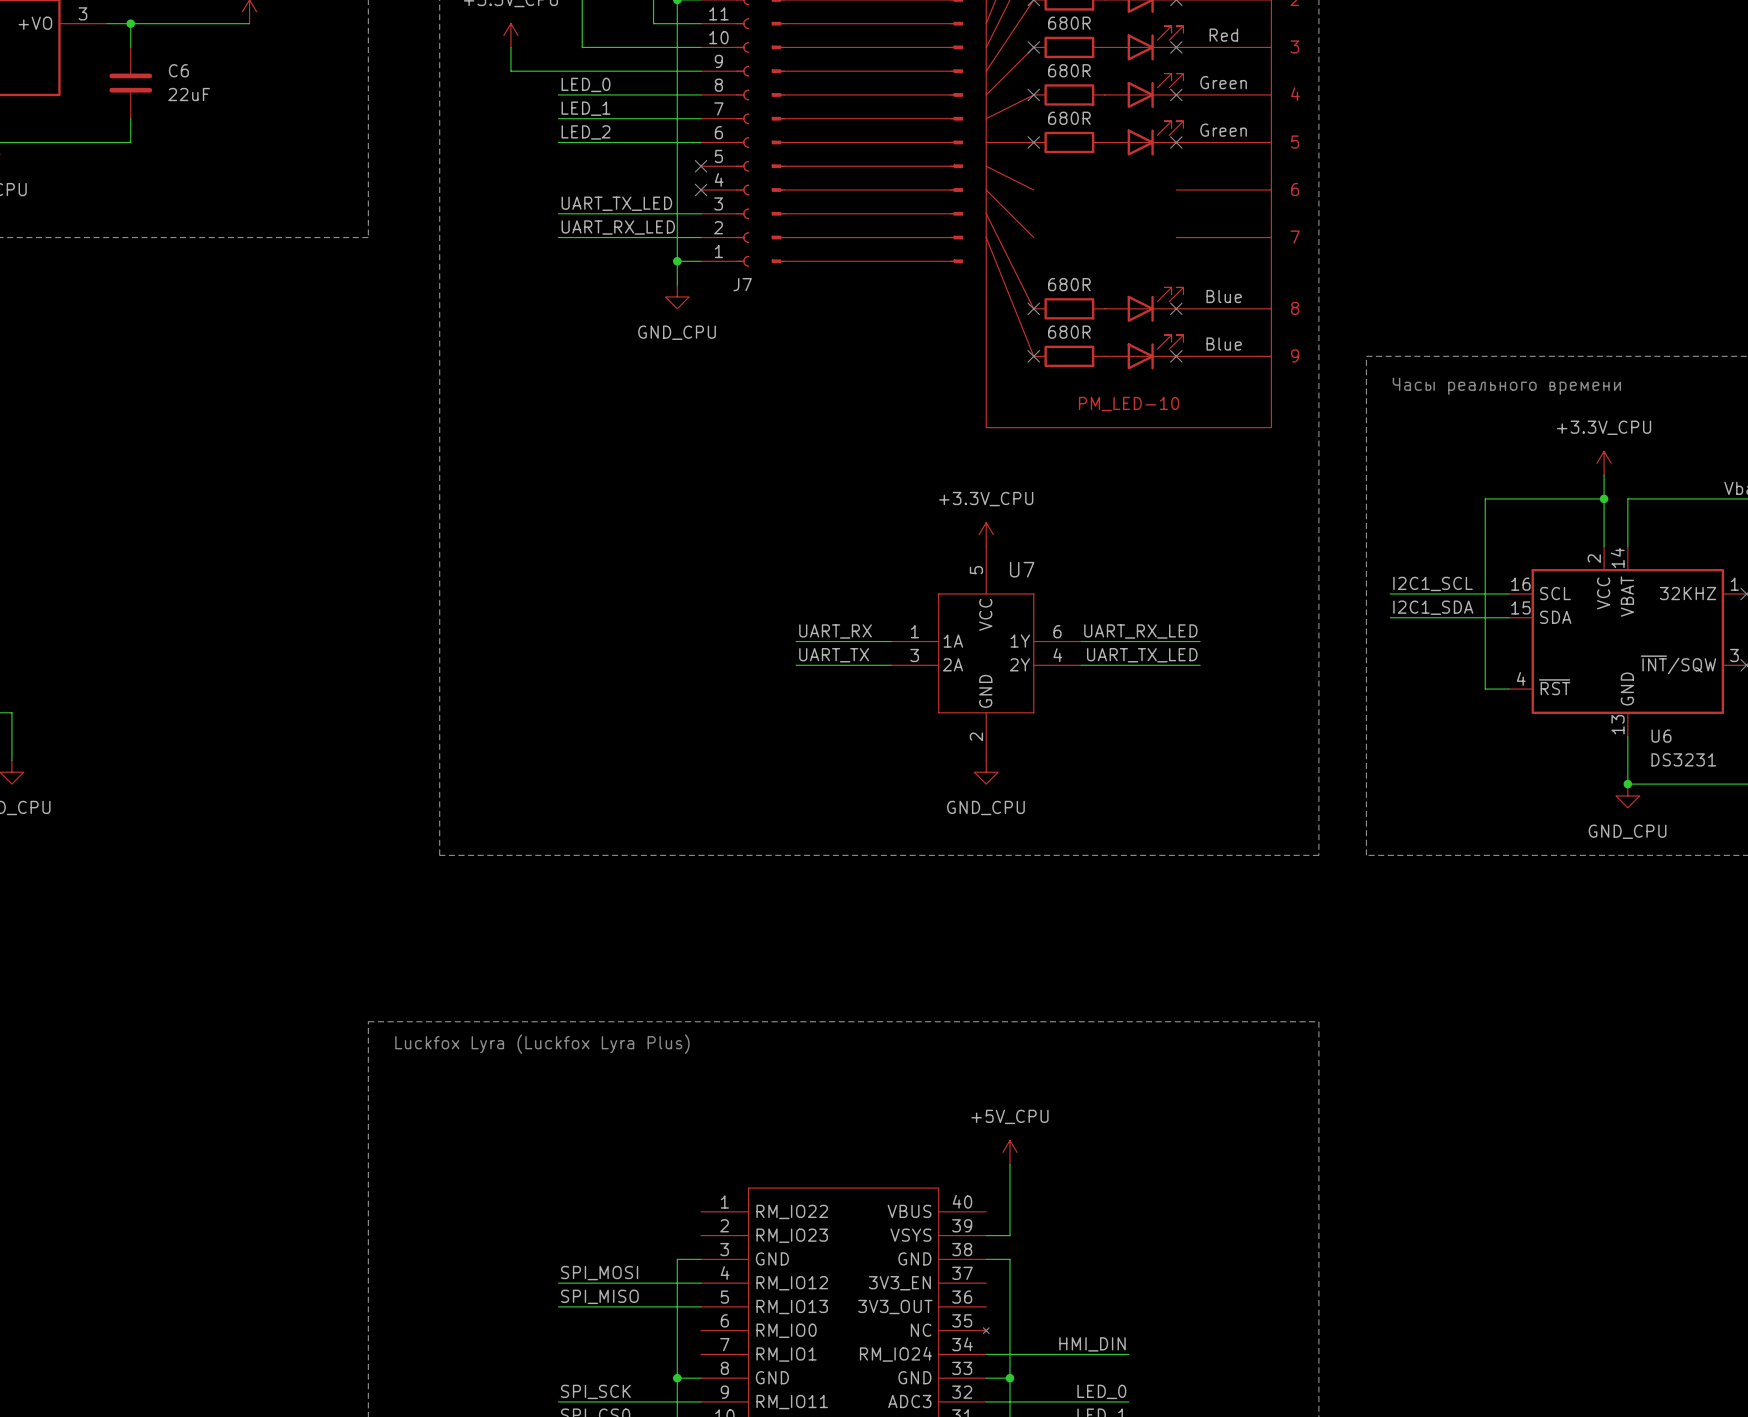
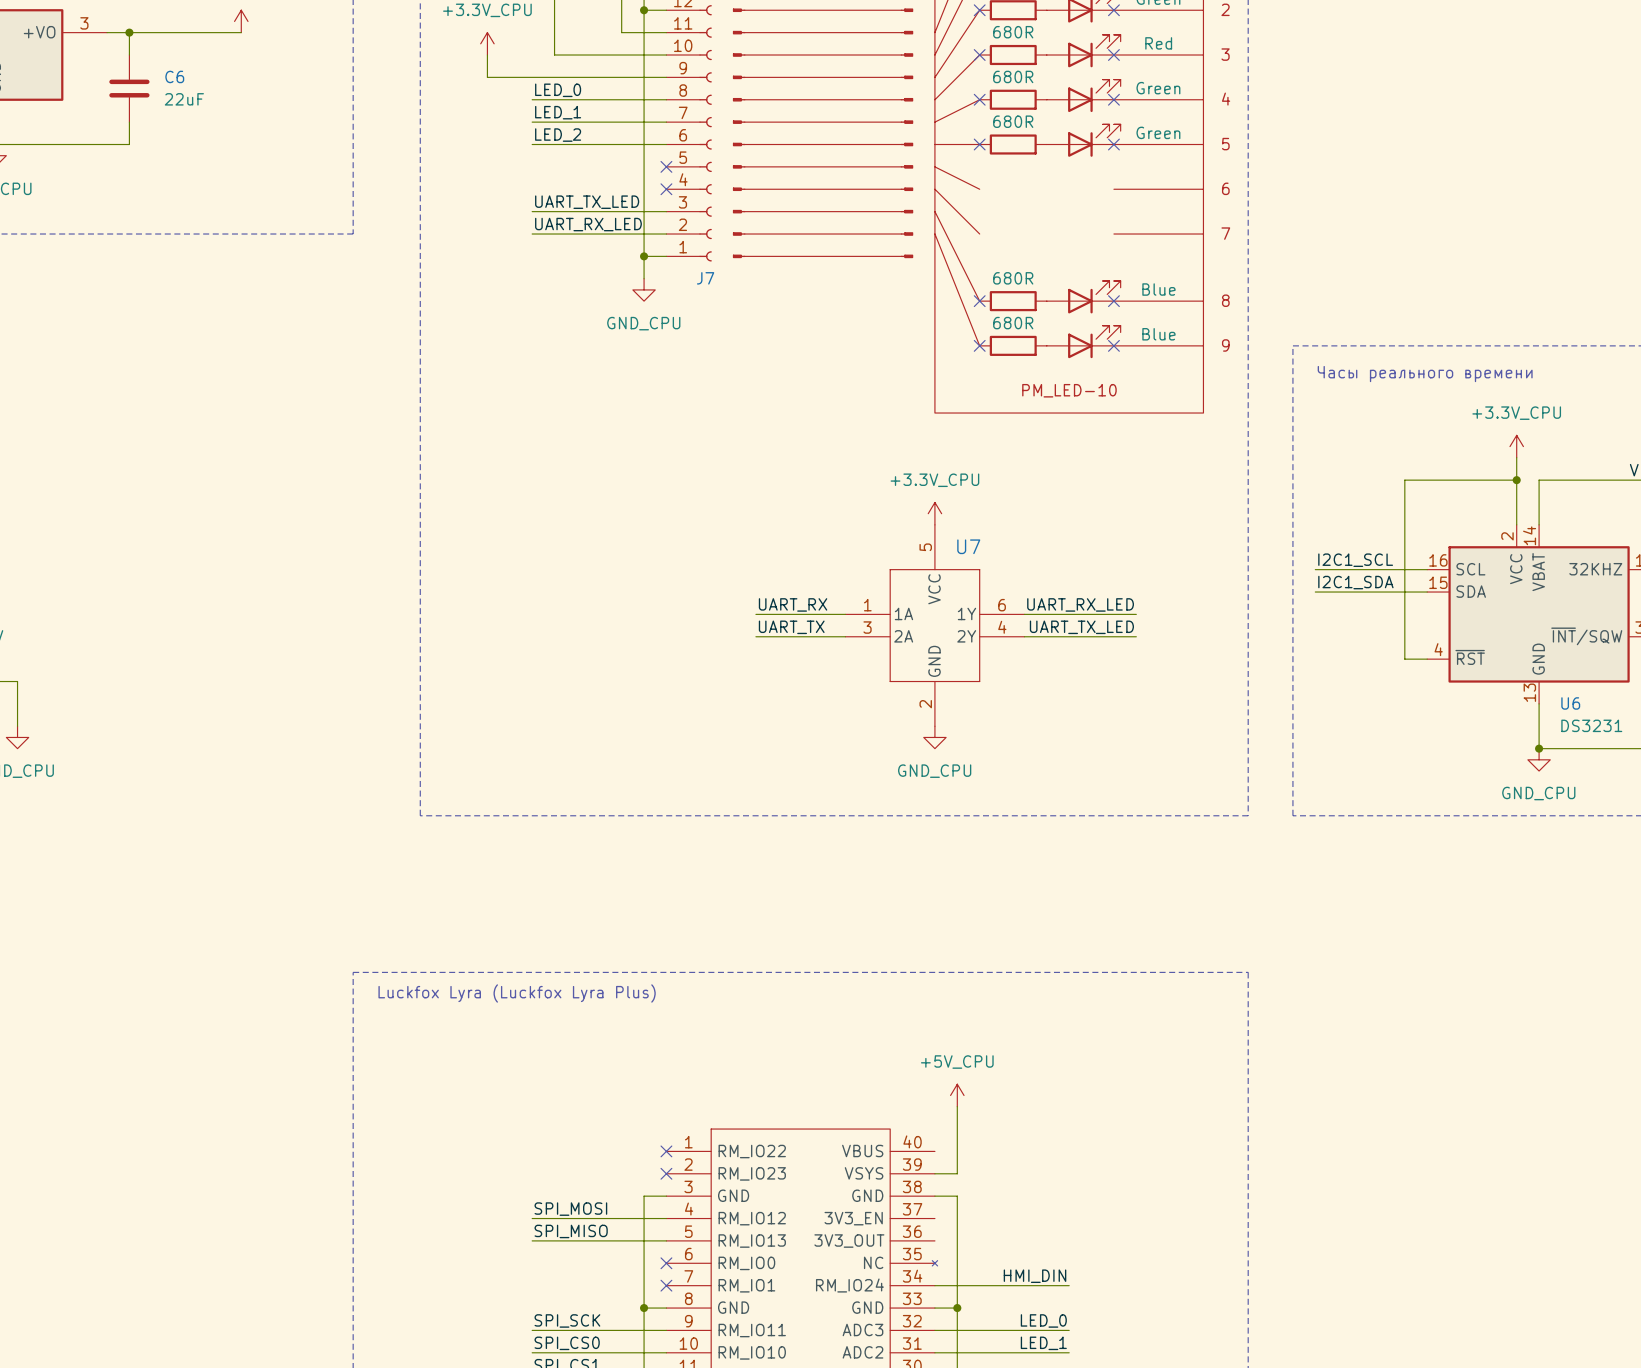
no-connect mark: none -> (666, 1151)
no-connect mark: none -> (666, 1173)
no-connect mark: none -> (666, 1263)
no-connect mark: none -> (666, 1285)

